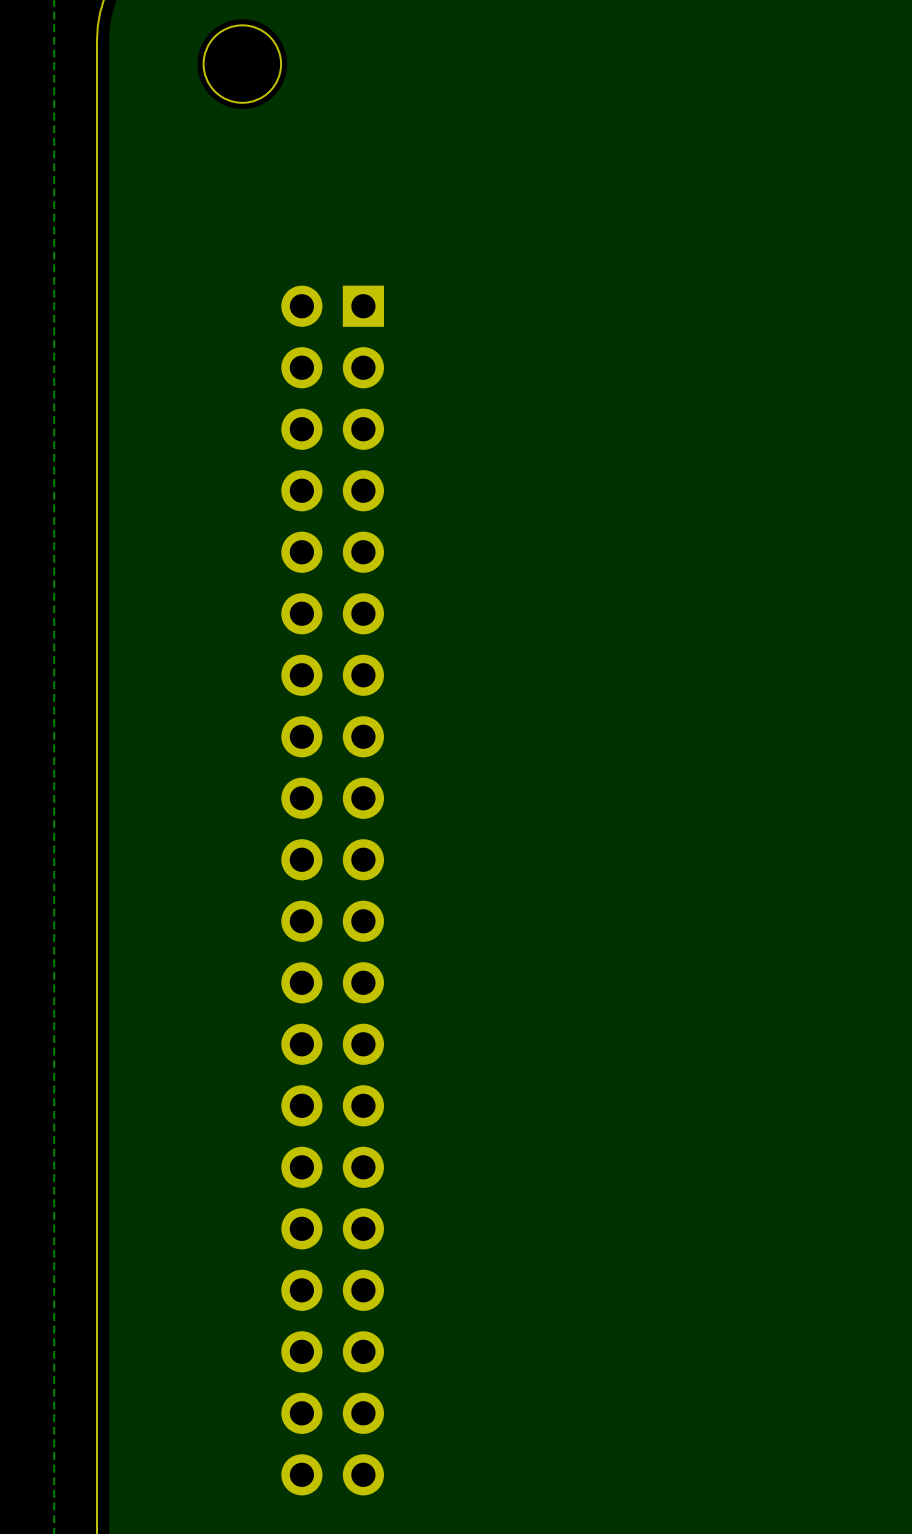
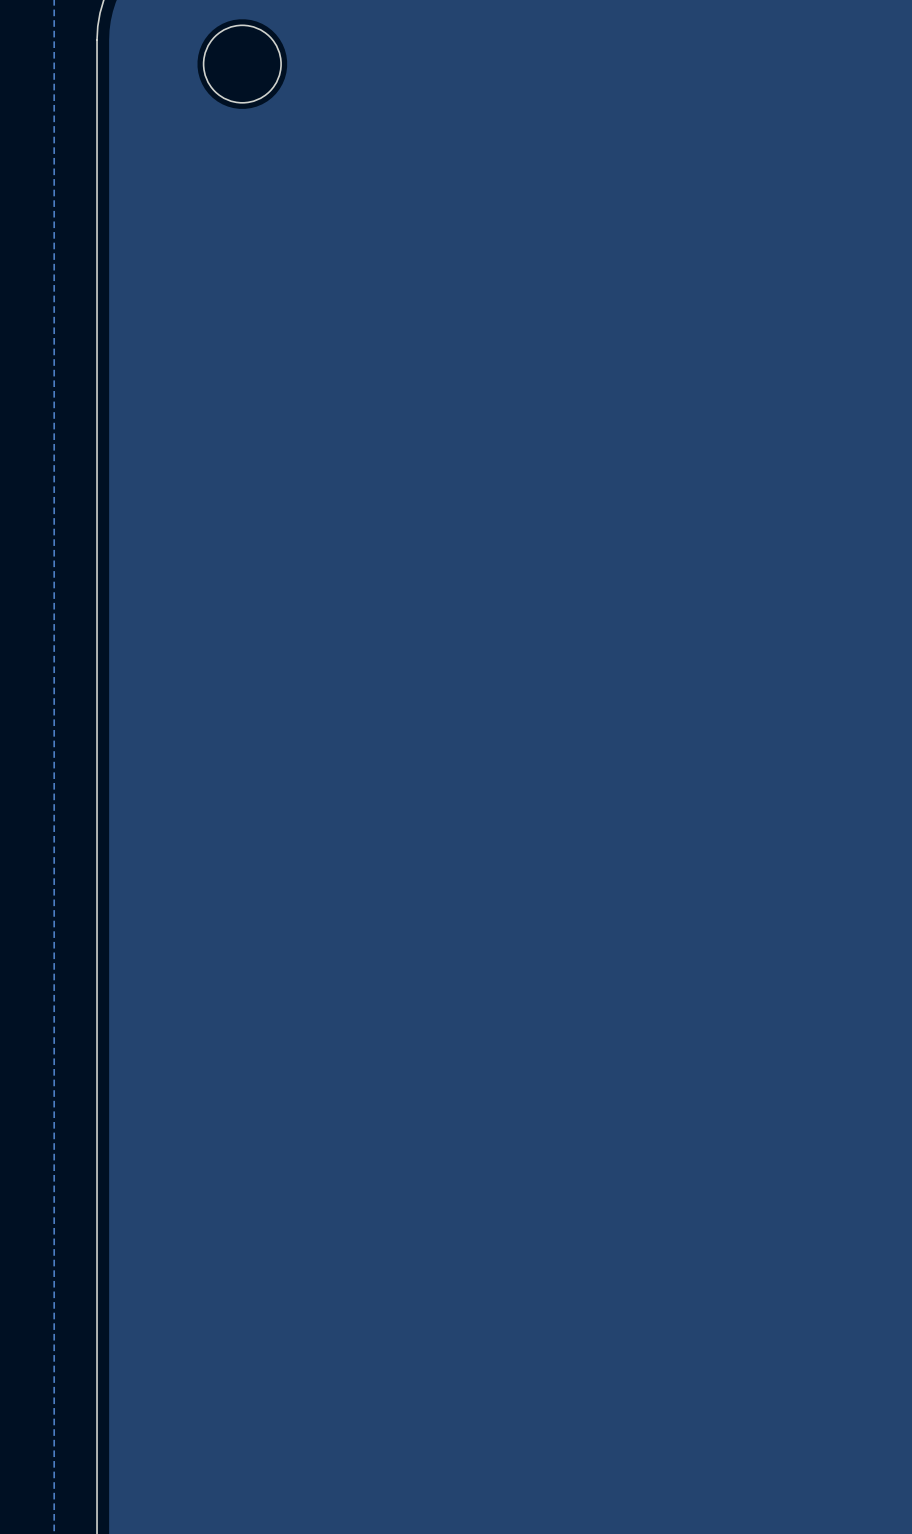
part: (332, 890) -> none

